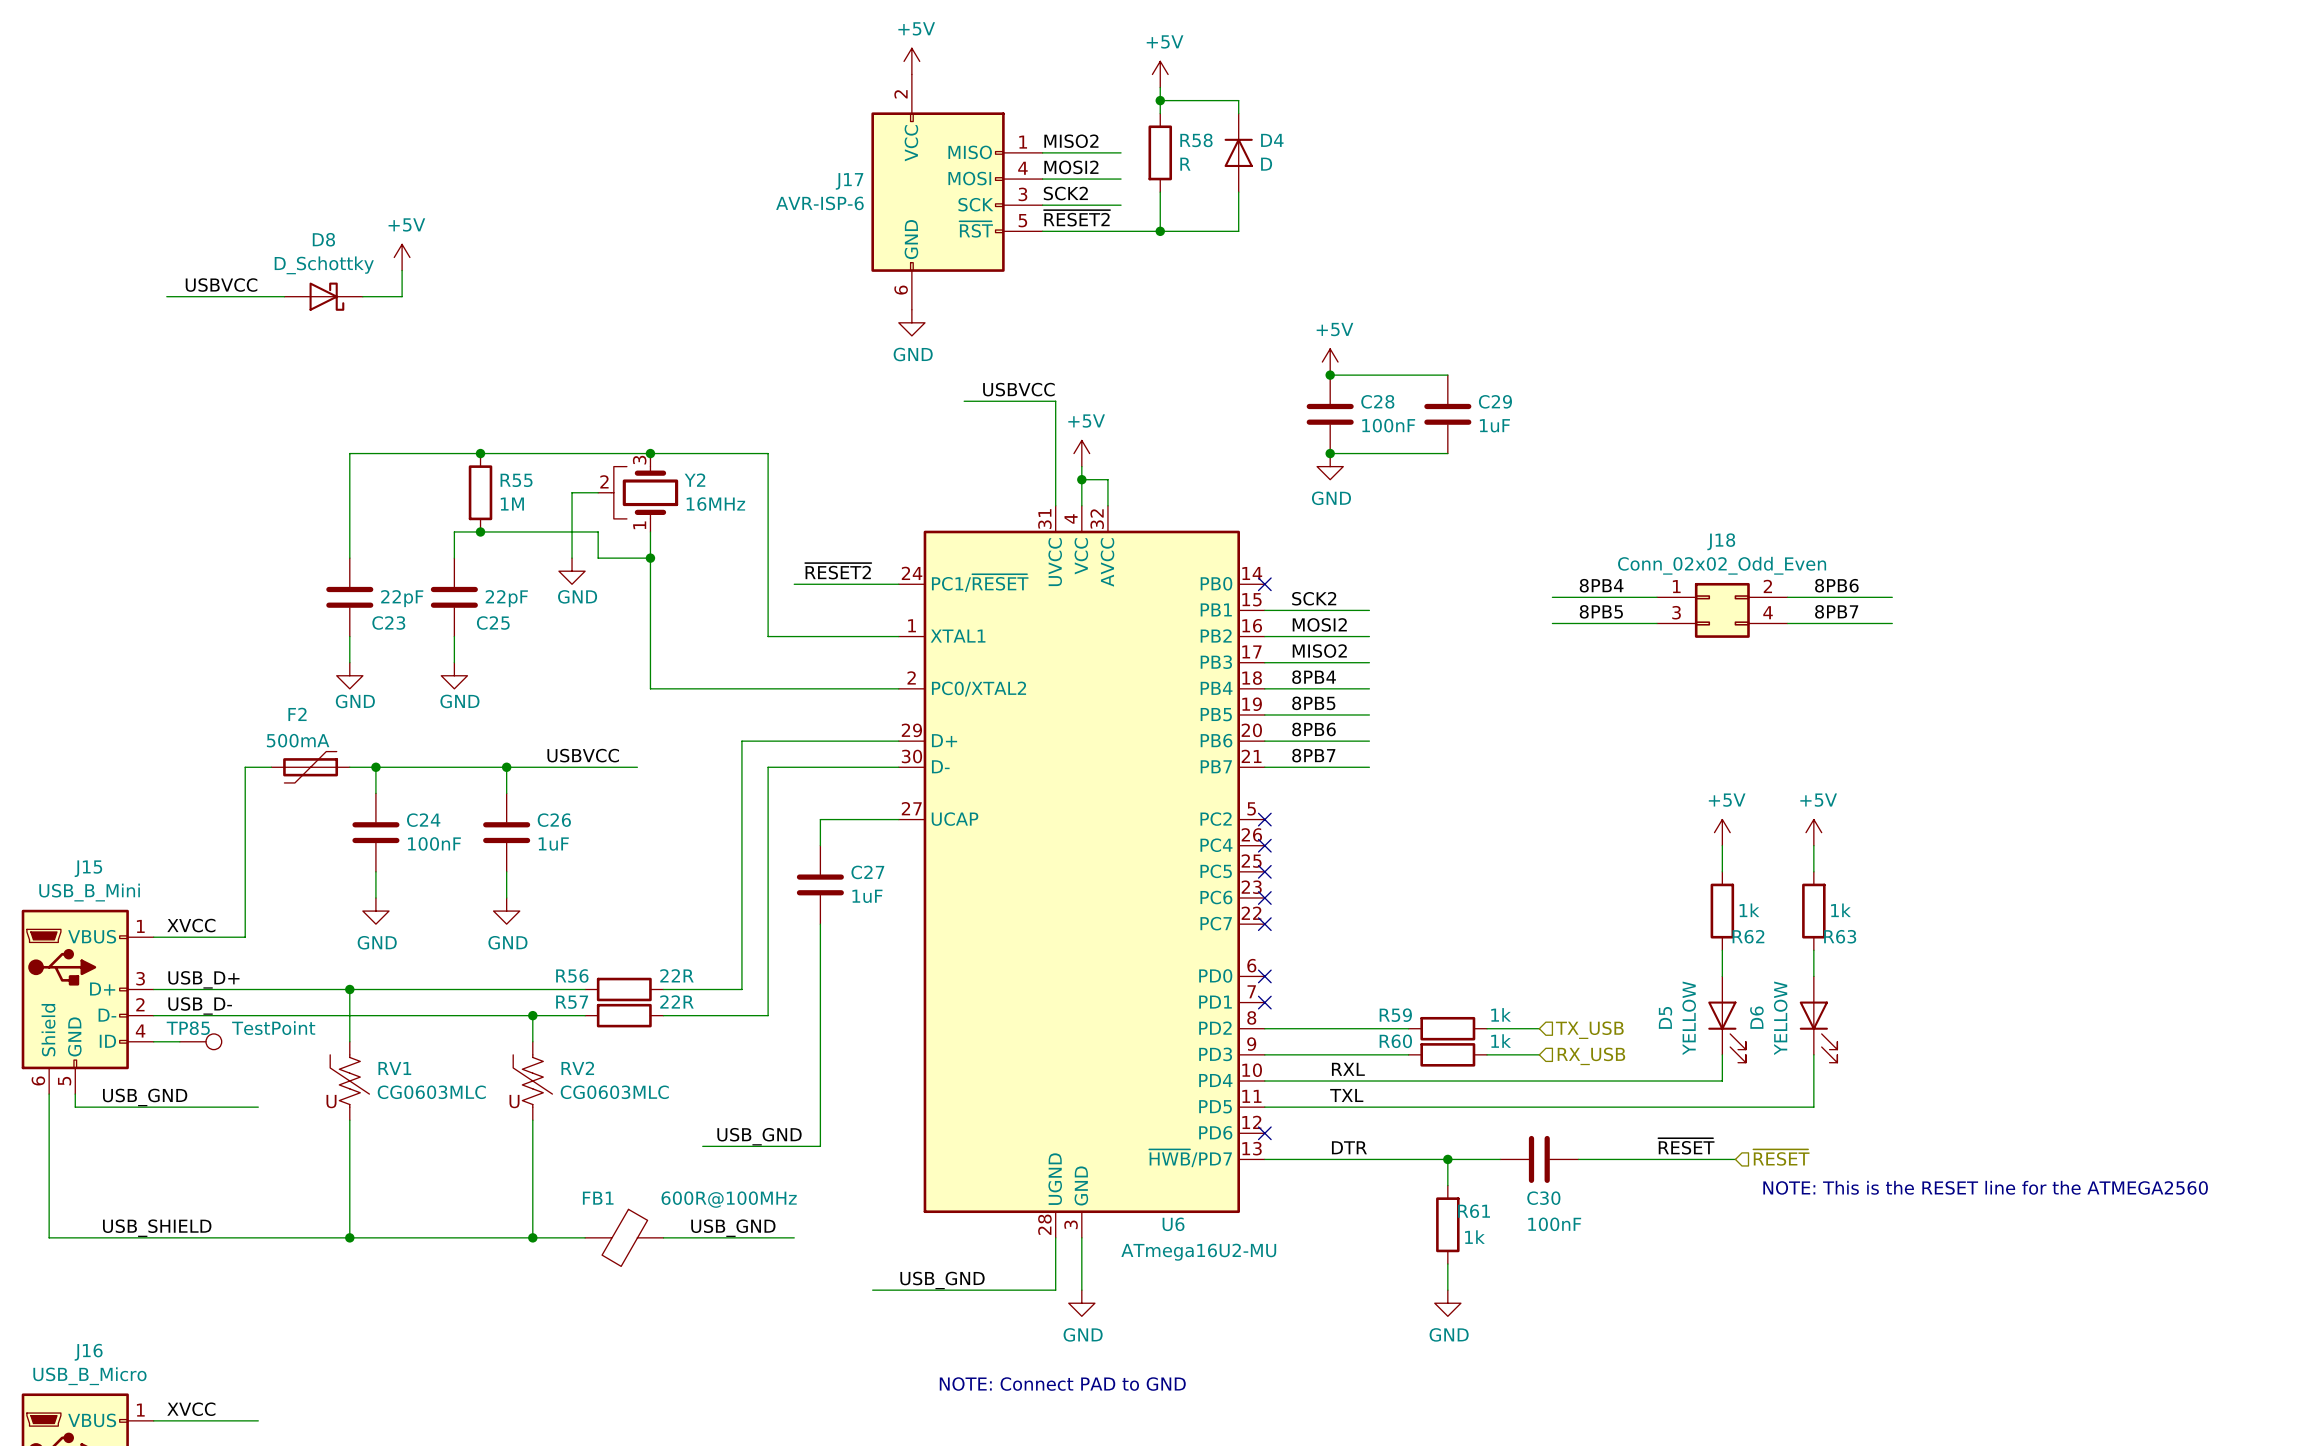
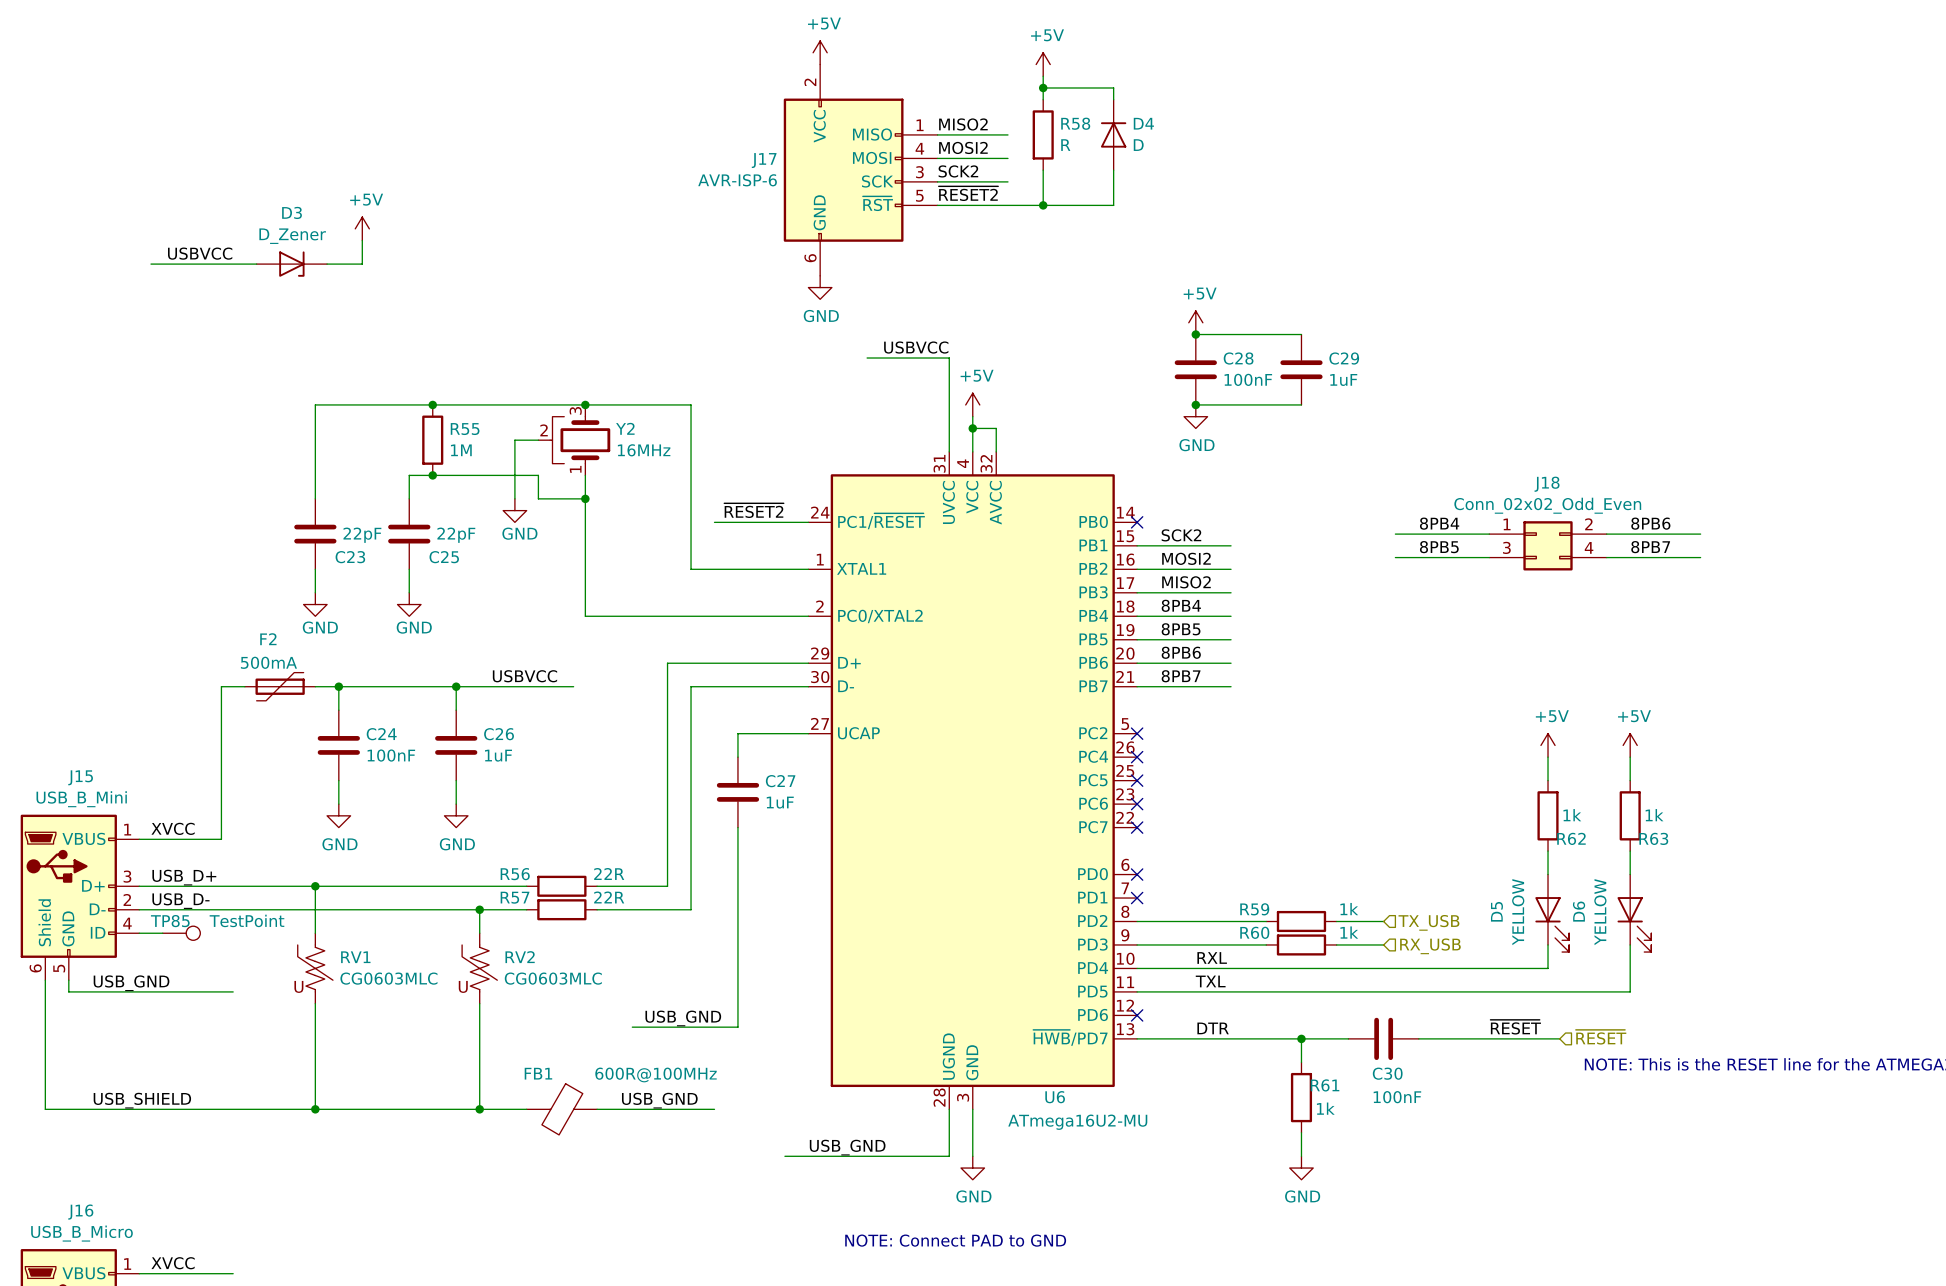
D8: D_Schottky (323, 296) -> none
D3: none -> D_Zener (291, 264)

